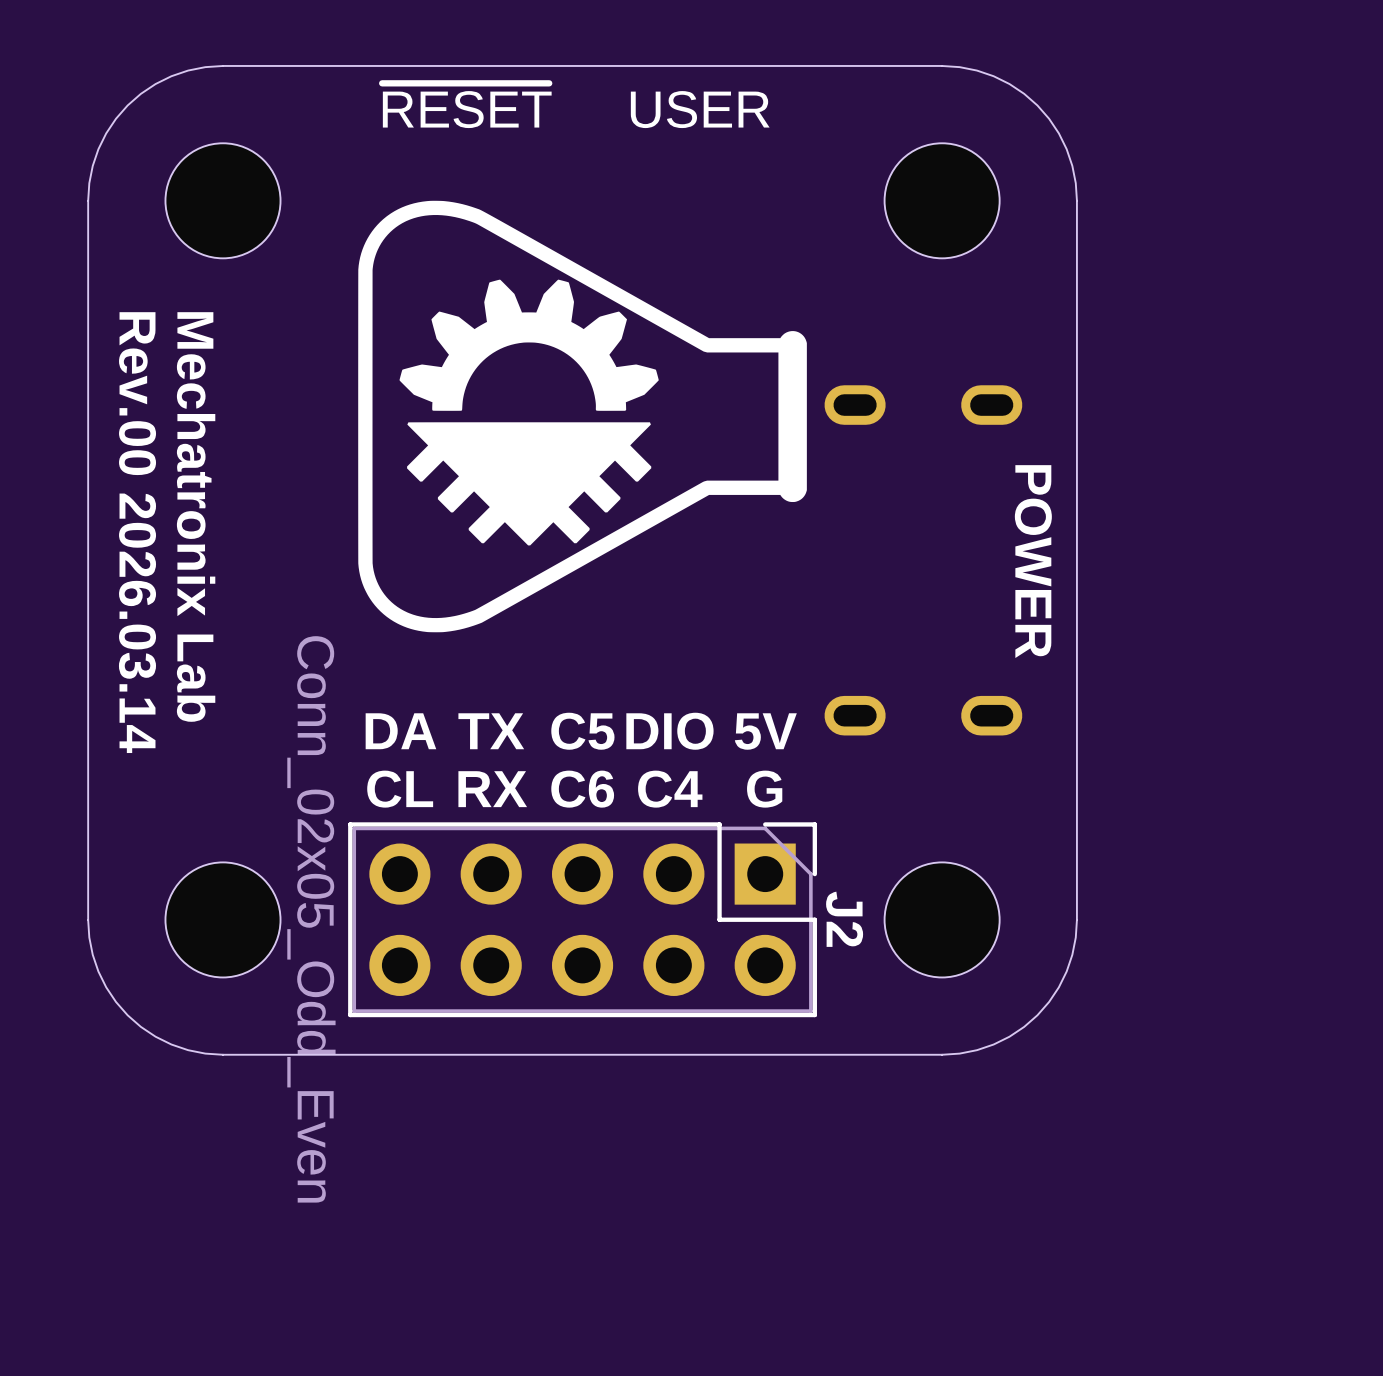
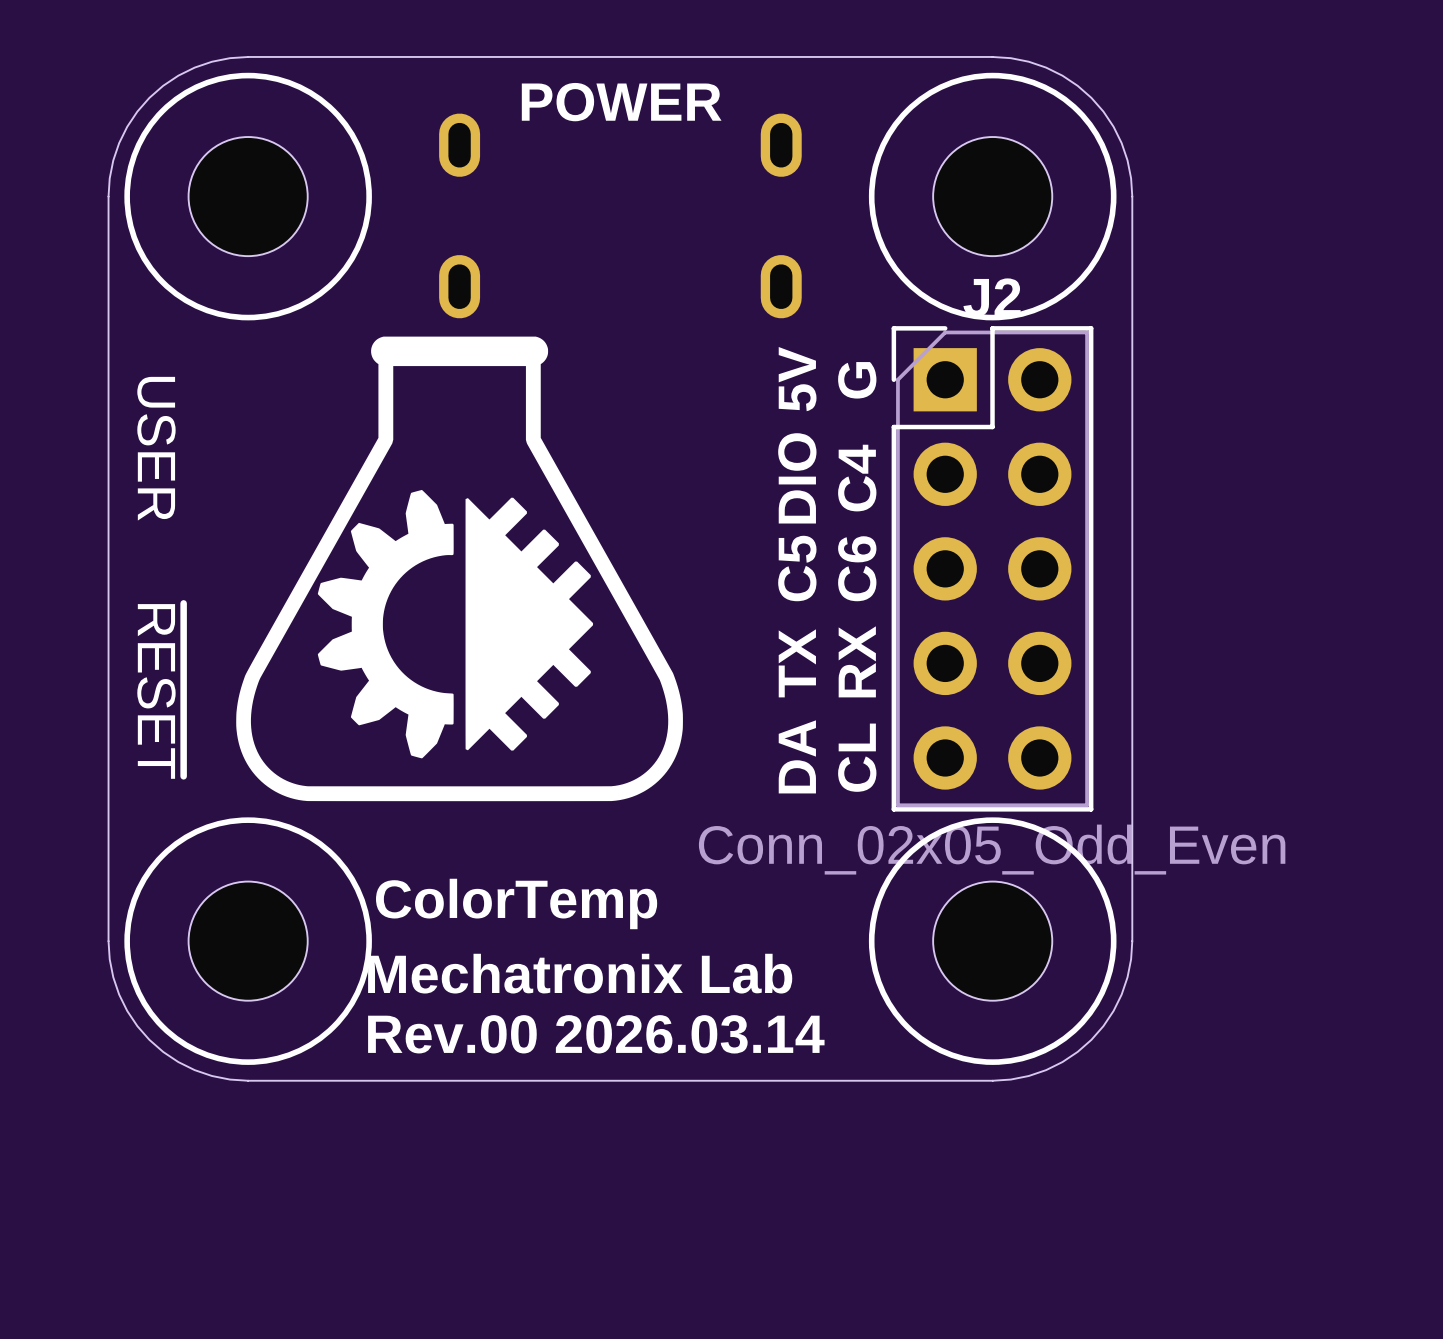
part position: (466, 105) -> (160, 691)
part value rotation: 0° (466, 105) -> 90° clockwise (160, 691)
part position: (700, 109) -> (156, 448)
part value rotation: 0° (700, 109) -> 90° clockwise (156, 448)
part footprint: [165, 143, 281, 259] -> [124, 72, 372, 321]
part footprint: [884, 143, 1000, 259] -> [868, 72, 1117, 321]
drawing: [358, 200, 807, 633] -> none
drawing: none -> [236, 336, 683, 802]
text rotation: 0° (196, 516) -> 90° counterclockwise (580, 973)
text position: Mechatronix Lab (196, 516) -> Mechatronix Lab (580, 973)
text rotation: 0° (137, 532) -> 90° counterclockwise (596, 1034)
text position: Rev.00 2026.03.14 (137, 532) -> Rev.00 2026.03.14 (596, 1034)
part rotation: 0° (923, 560) -> 90° clockwise (620, 215)
part position: (923, 560) -> (620, 215)
part value position: POWER (1033, 561) -> POWER (621, 102)
text rotation: 0° (400, 731) -> 90° counterclockwise (797, 756)
text position: DA (400, 731) -> DA (797, 756)
text rotation: 0° (491, 731) -> 90° counterclockwise (797, 663)
text position: TX (491, 731) -> TX (797, 663)
text rotation: 0° (582, 731) -> 90° counterclockwise (797, 568)
text position: C5 (582, 731) -> C5 (797, 568)
text rotation: 0° (669, 731) -> 90° counterclockwise (797, 478)
text position: DIO (669, 731) -> DIO (797, 478)
text rotation: 0° (765, 731) -> 90° counterclockwise (797, 379)
text position: 5V (765, 731) -> 5V (797, 379)
text rotation: 0° (400, 789) -> 90° counterclockwise (857, 757)
text position: CL (400, 789) -> CL (857, 757)
text rotation: 0° (492, 789) -> 90° counterclockwise (857, 661)
text position: RX (492, 789) -> RX (857, 661)
text rotation: 0° (582, 789) -> 90° counterclockwise (857, 568)
text position: C6 (582, 789) -> C6 (857, 568)
text rotation: 0° (670, 789) -> 90° counterclockwise (857, 478)
text position: C4 (670, 789) -> C4 (857, 478)
text rotation: 0° (764, 789) -> 90° counterclockwise (857, 380)
text position: G (764, 789) -> G (857, 380)
part footprint: [165, 862, 281, 978] -> [124, 817, 372, 1065]
part footprint: [884, 862, 1000, 978] -> [868, 817, 1117, 1065]
text: none -> ColorTemp (516, 903)
J2 rotation: 0° (582, 919) -> 90° counterclockwise (992, 568)
J2 position: (582, 919) -> (992, 568)

